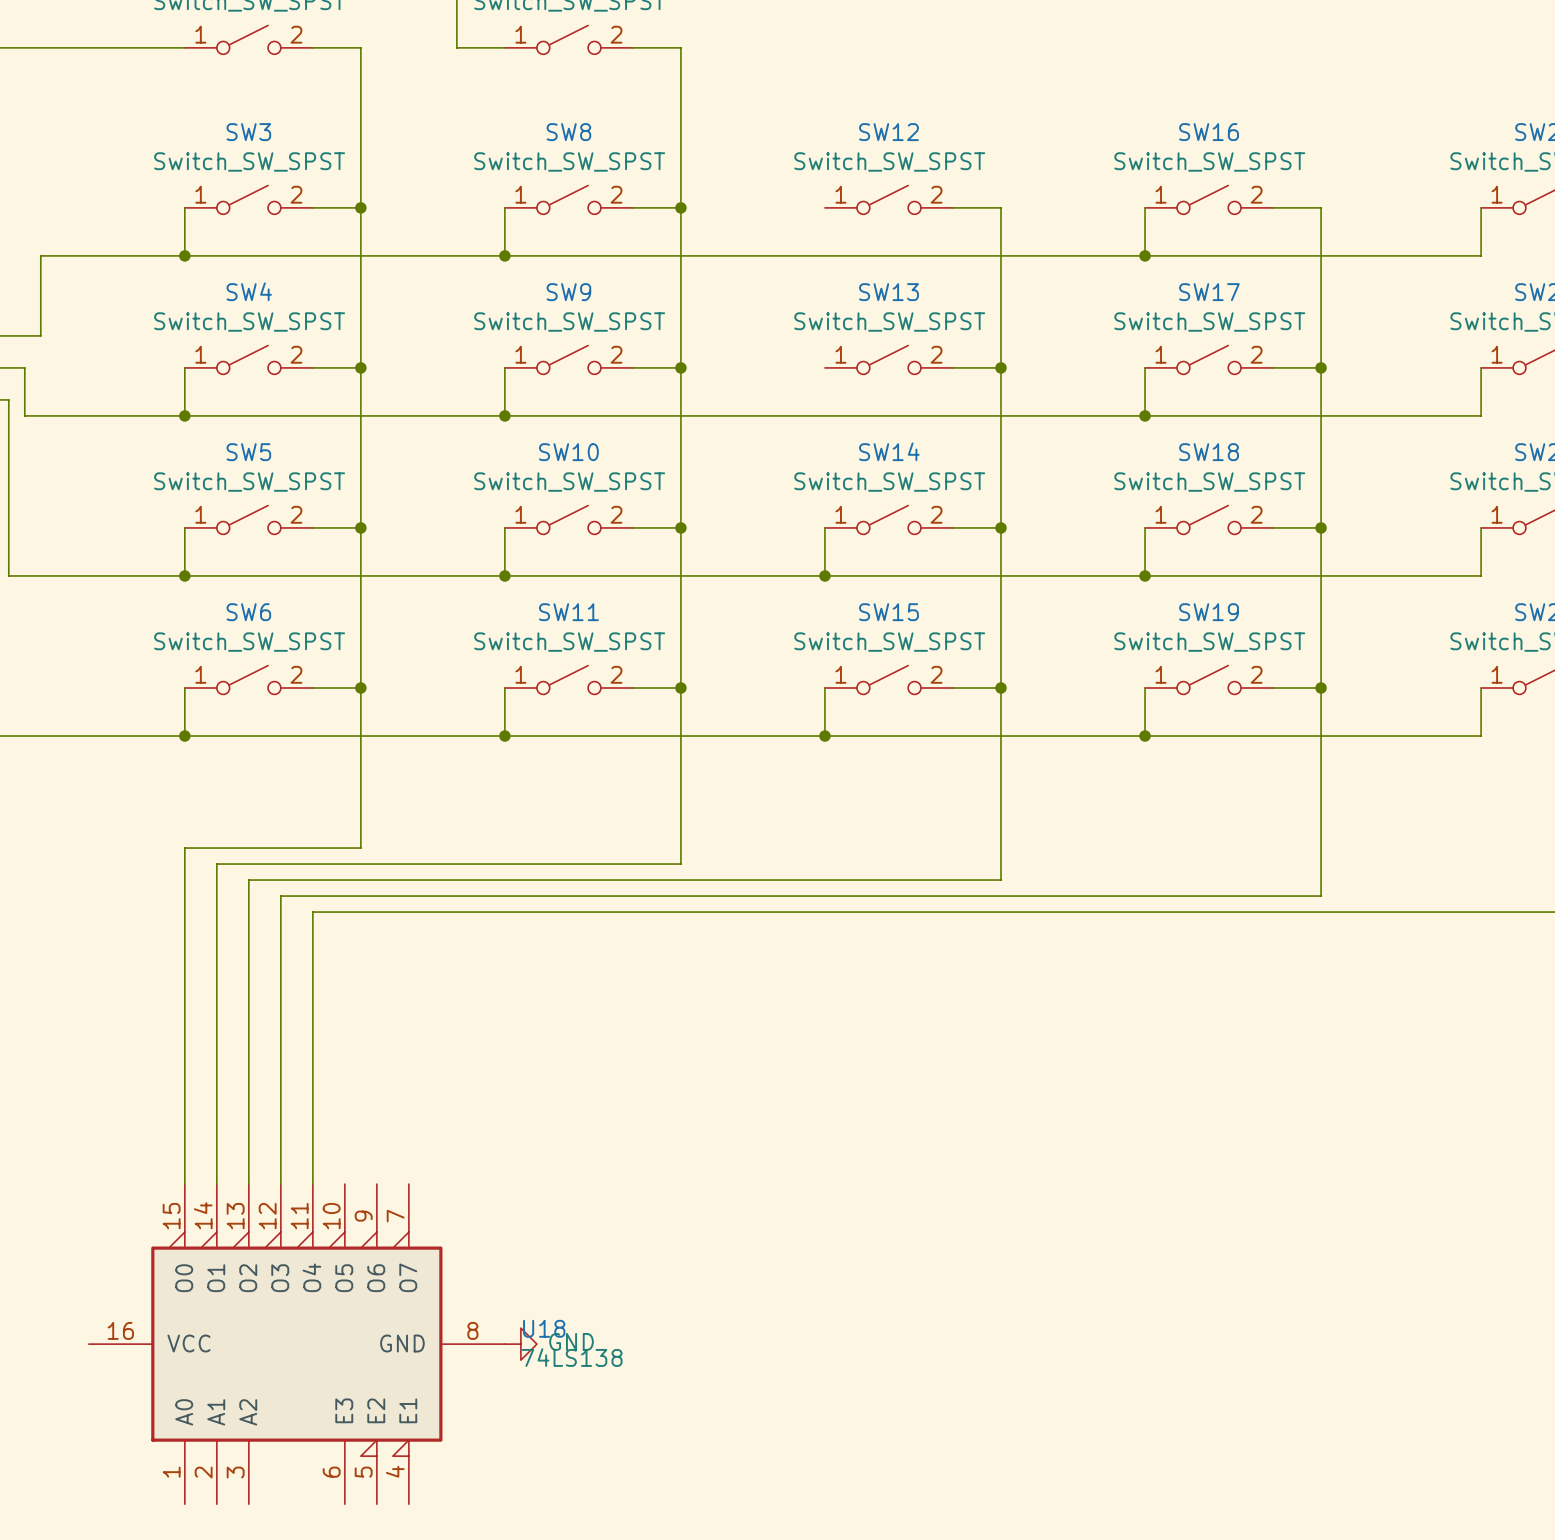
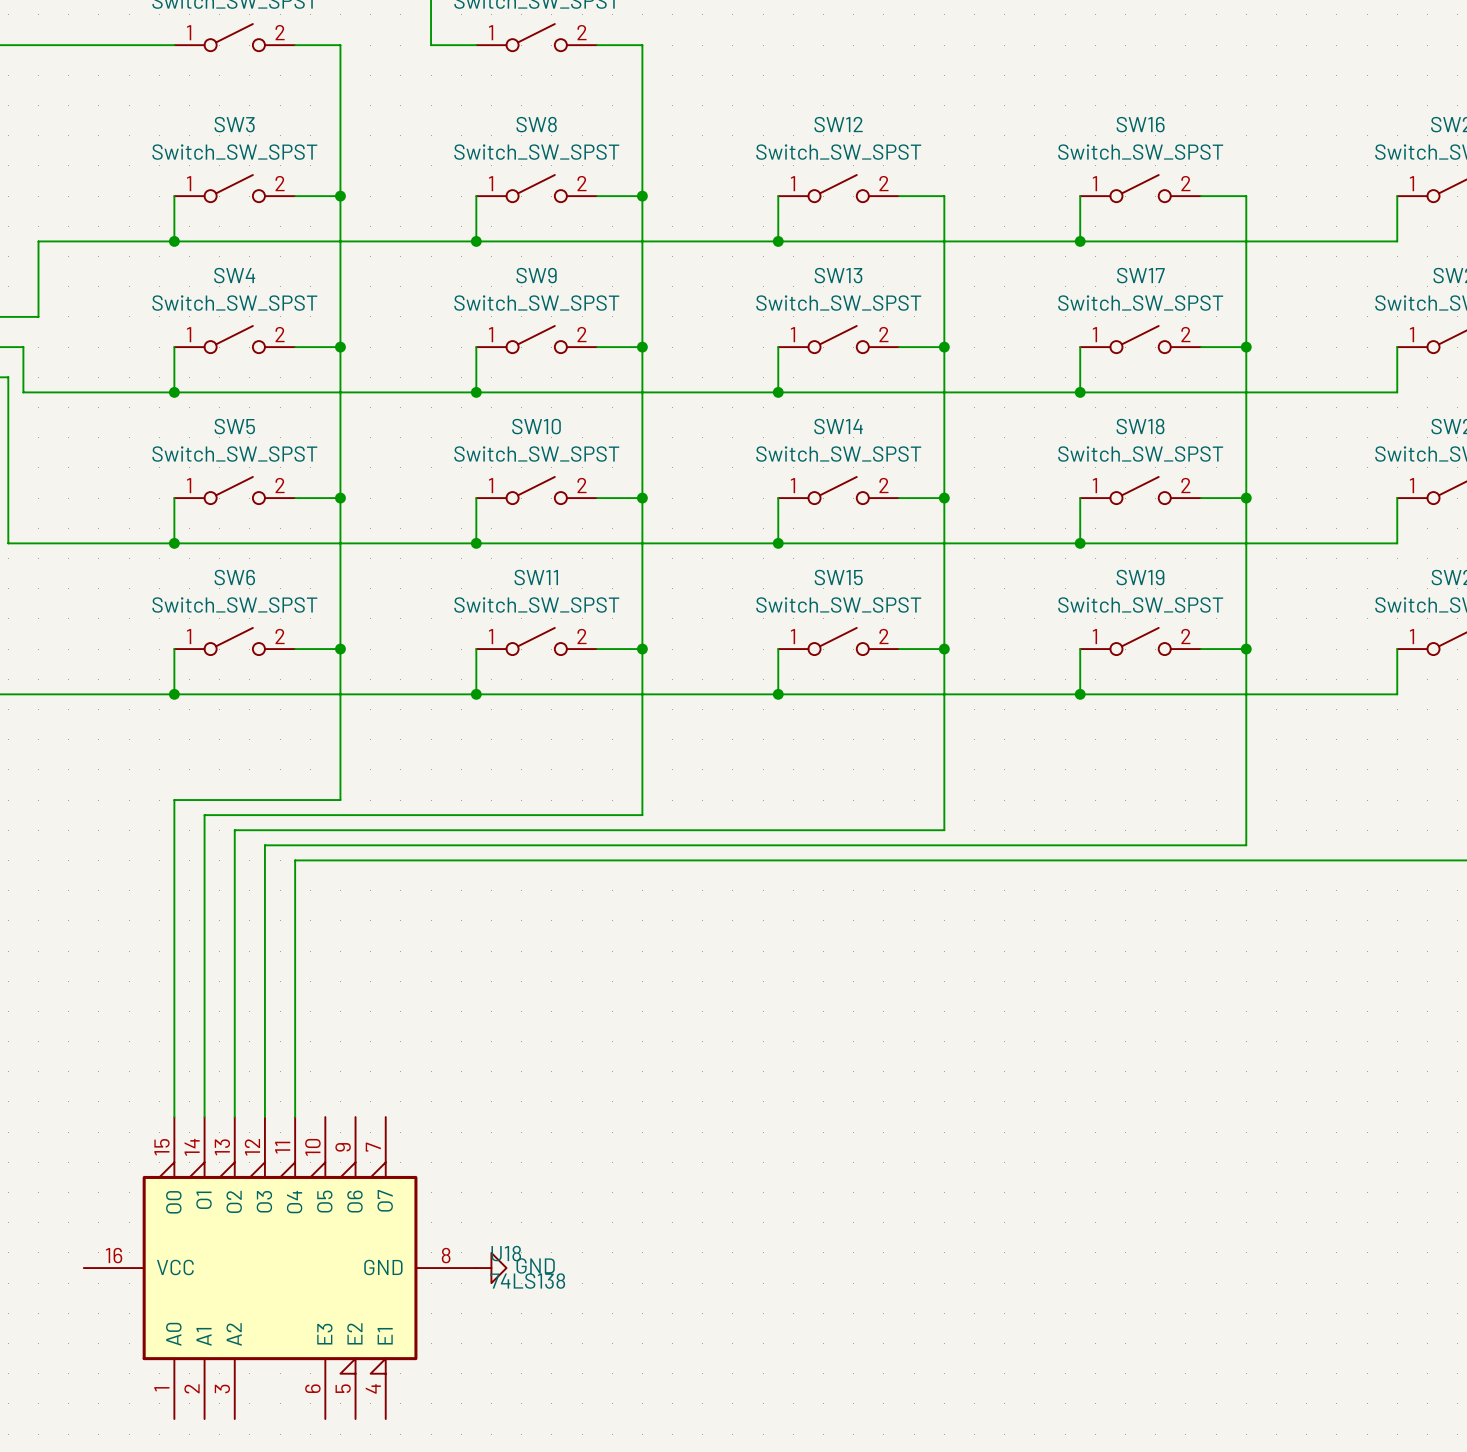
wire: none -> (778, 196) (778, 241)
junction: none -> (778, 241)
wire: none -> (778, 347) (778, 392)
junction: none -> (778, 392)

